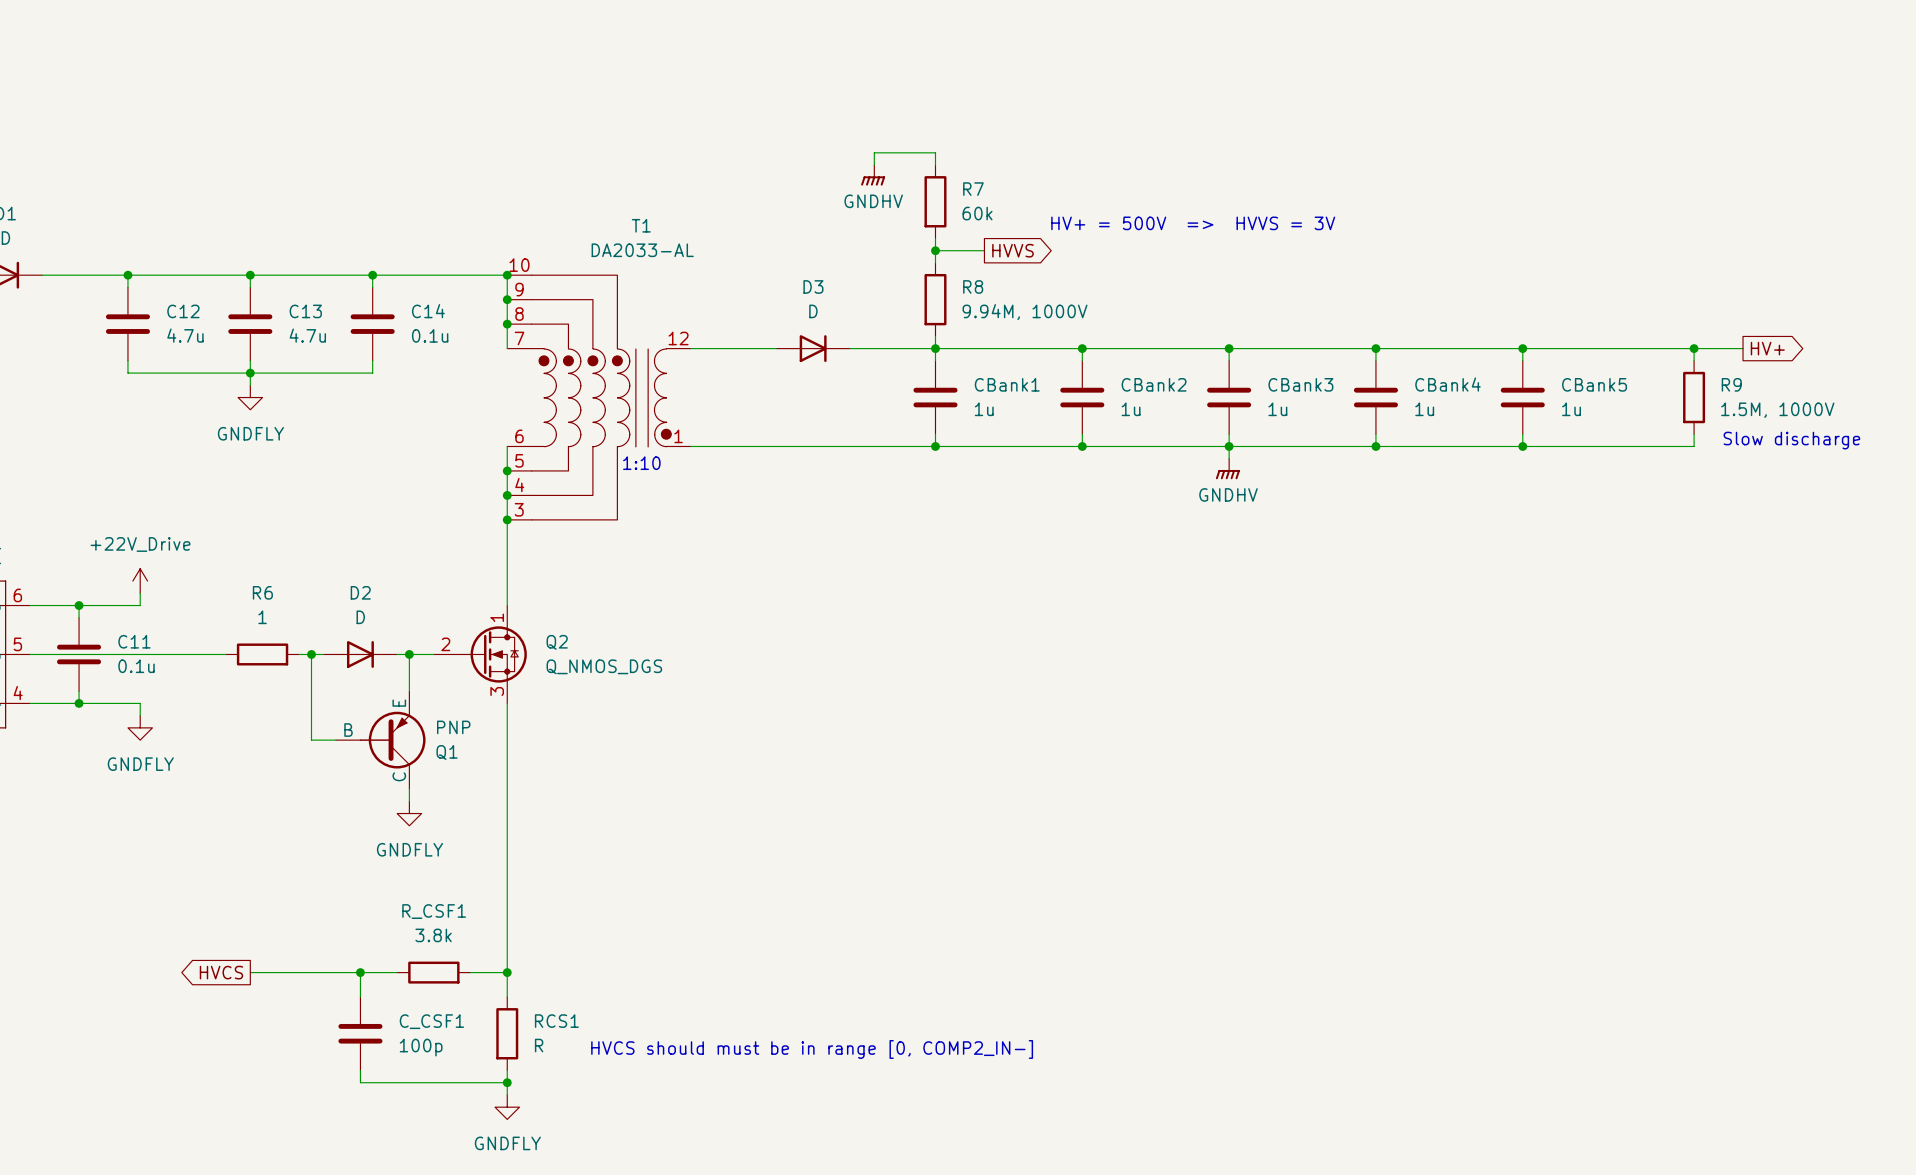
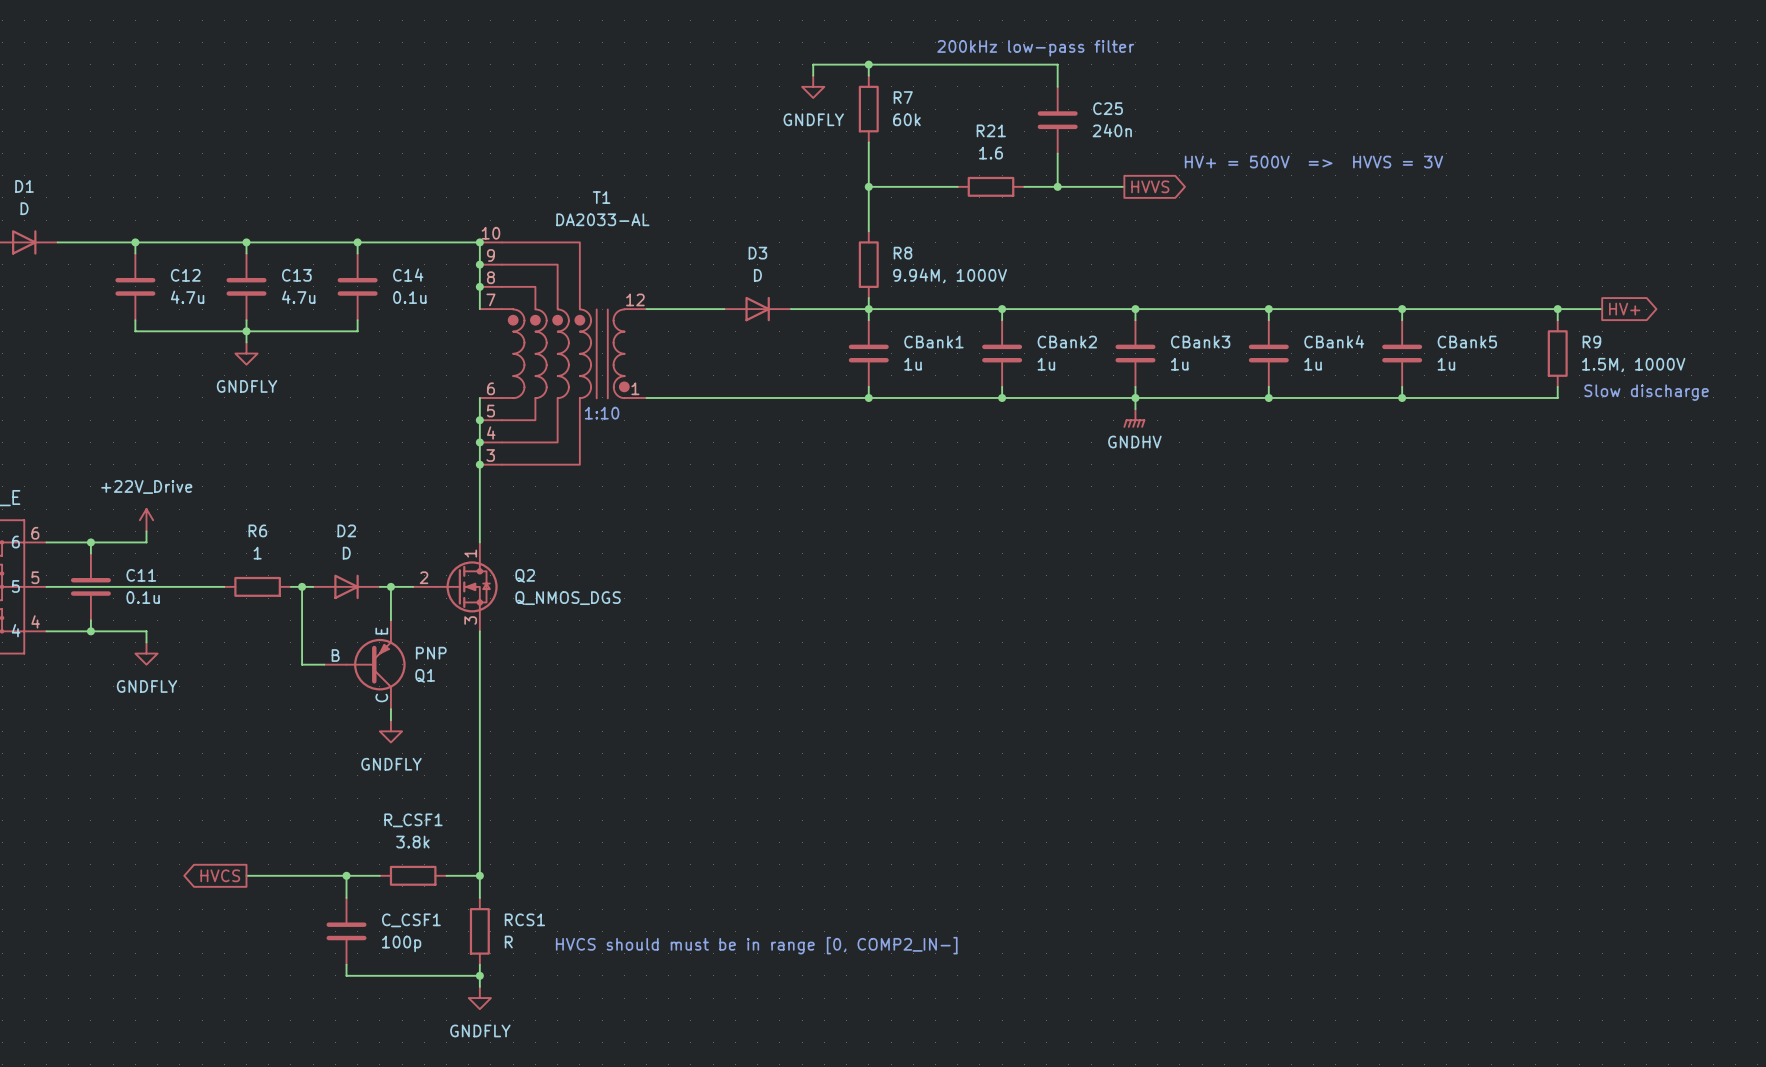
text: none -> 200kHz low-pass filter (1035, 48)
wire: none -> (868, 64) (868, 75)
junction: none -> (868, 64)
wire: none -> (813, 75) (813, 64) (1057, 64) (1057, 86)
power symbol: none -> GNDFLY (813, 86)
C25: none -> 240n (1057, 120)
wire: (874, 165) (874, 152) (935, 152) (935, 165) -> (868, 209) (868, 142)
power symbol: GNDHV (873, 175) -> none
wire: none -> (1057, 153) (1057, 186)
R7 position: (935, 201) -> (868, 109)
wire: none -> (868, 186) (957, 186)
R21: none -> 1.6 (991, 186)
wire: none -> (1024, 186) (1124, 186)
junction: none -> (1057, 186)
text position: HV+ = 500V => HVVS = 3V (1193, 223) -> HV+ = 500V => HVVS = 3V (1313, 162)
wire: (935, 250) (984, 250) -> none
junction position: (935, 250) -> (868, 186)
global label position: HVVS (1013, 250) -> HVVS (1150, 186)

